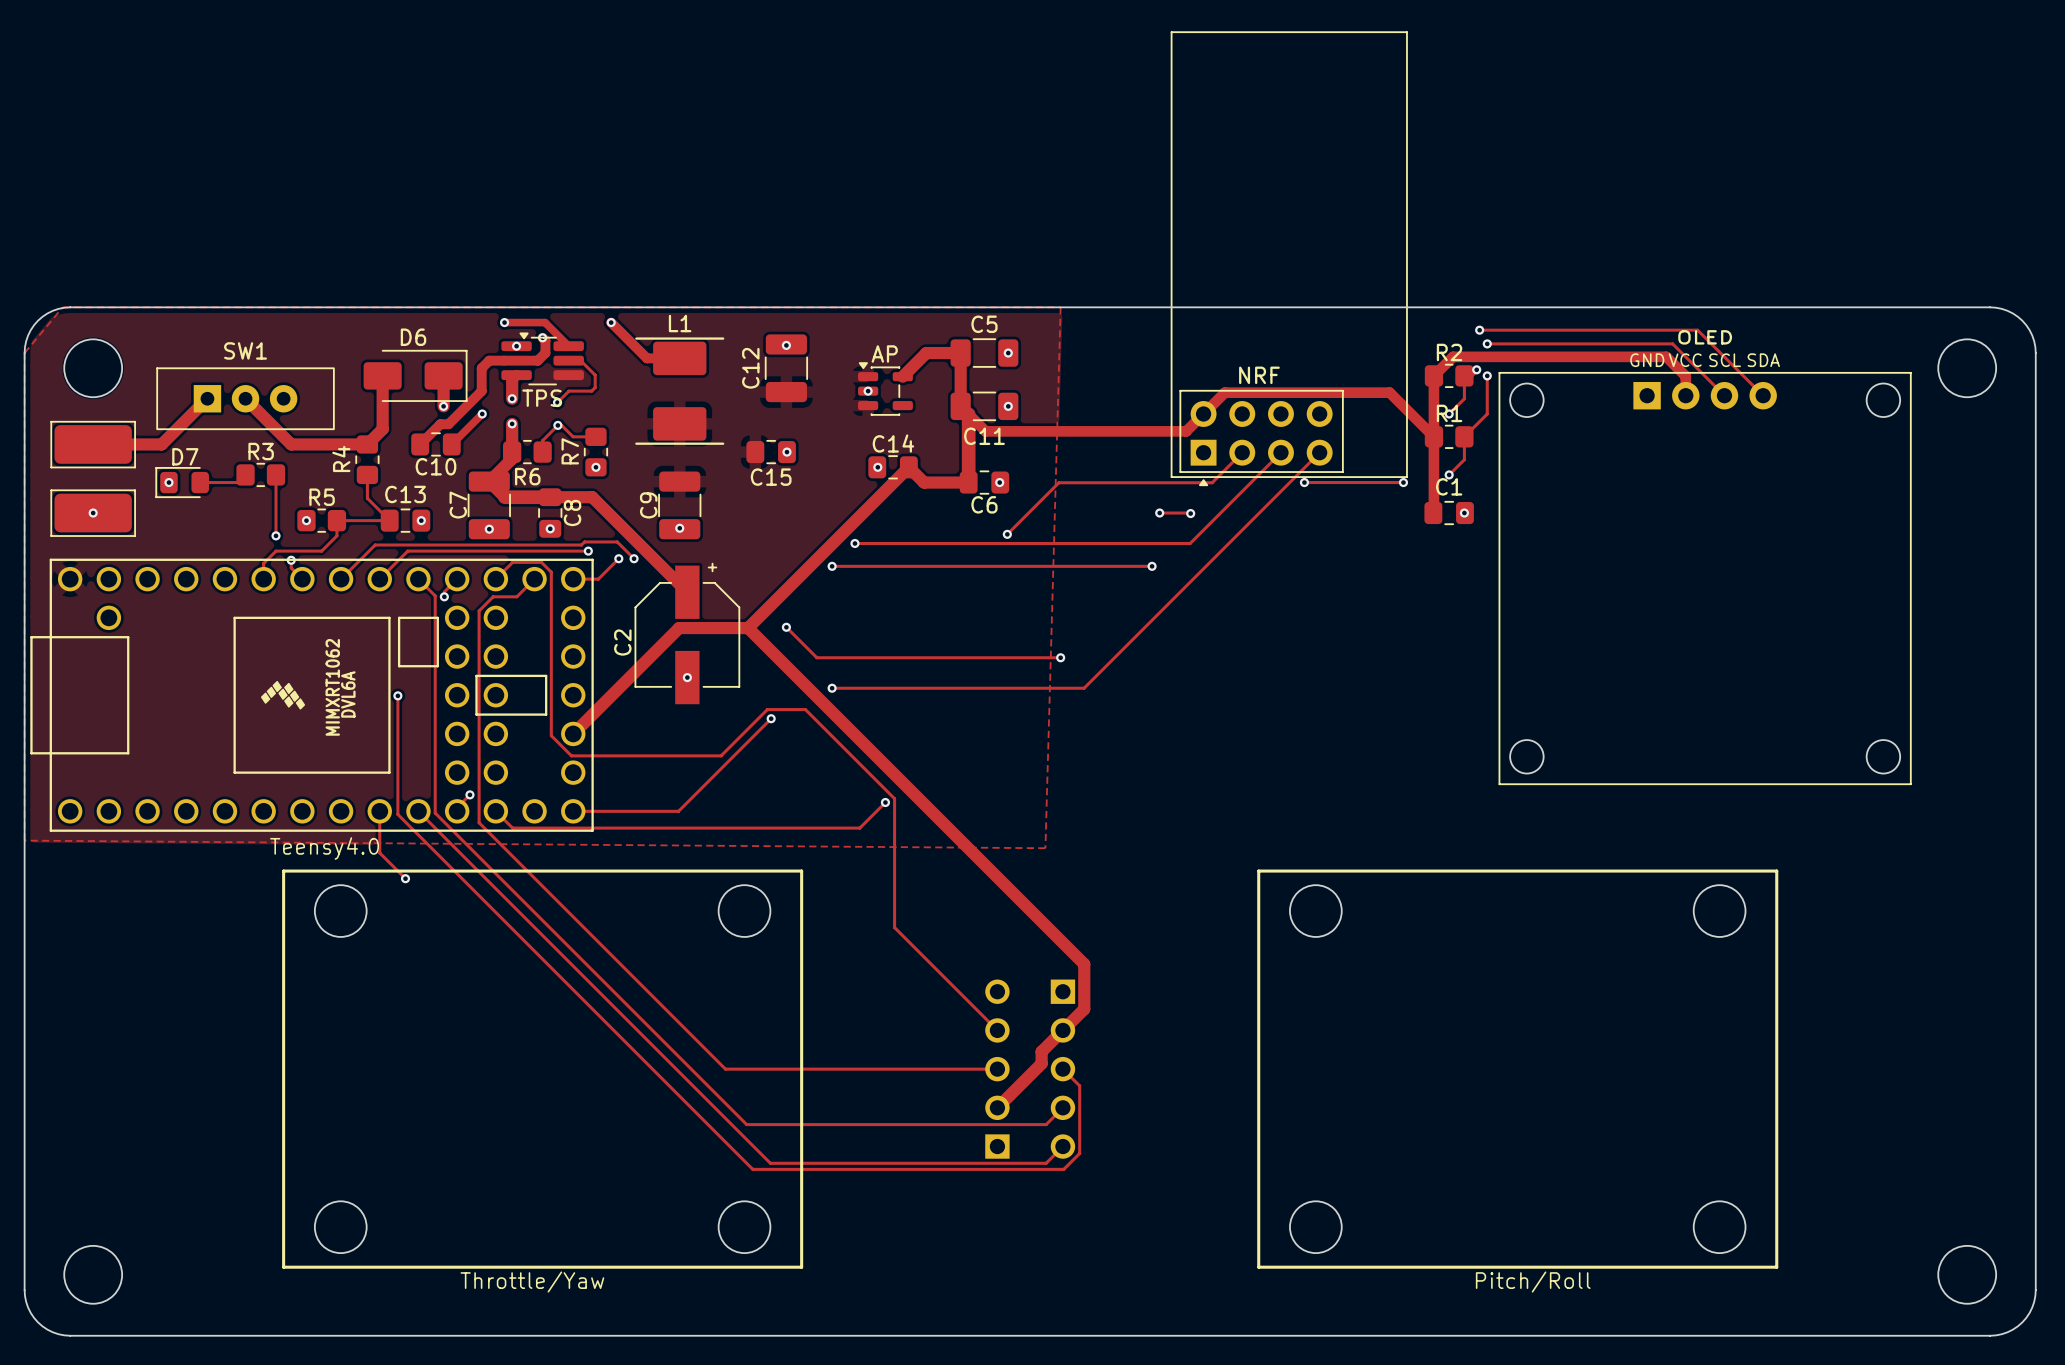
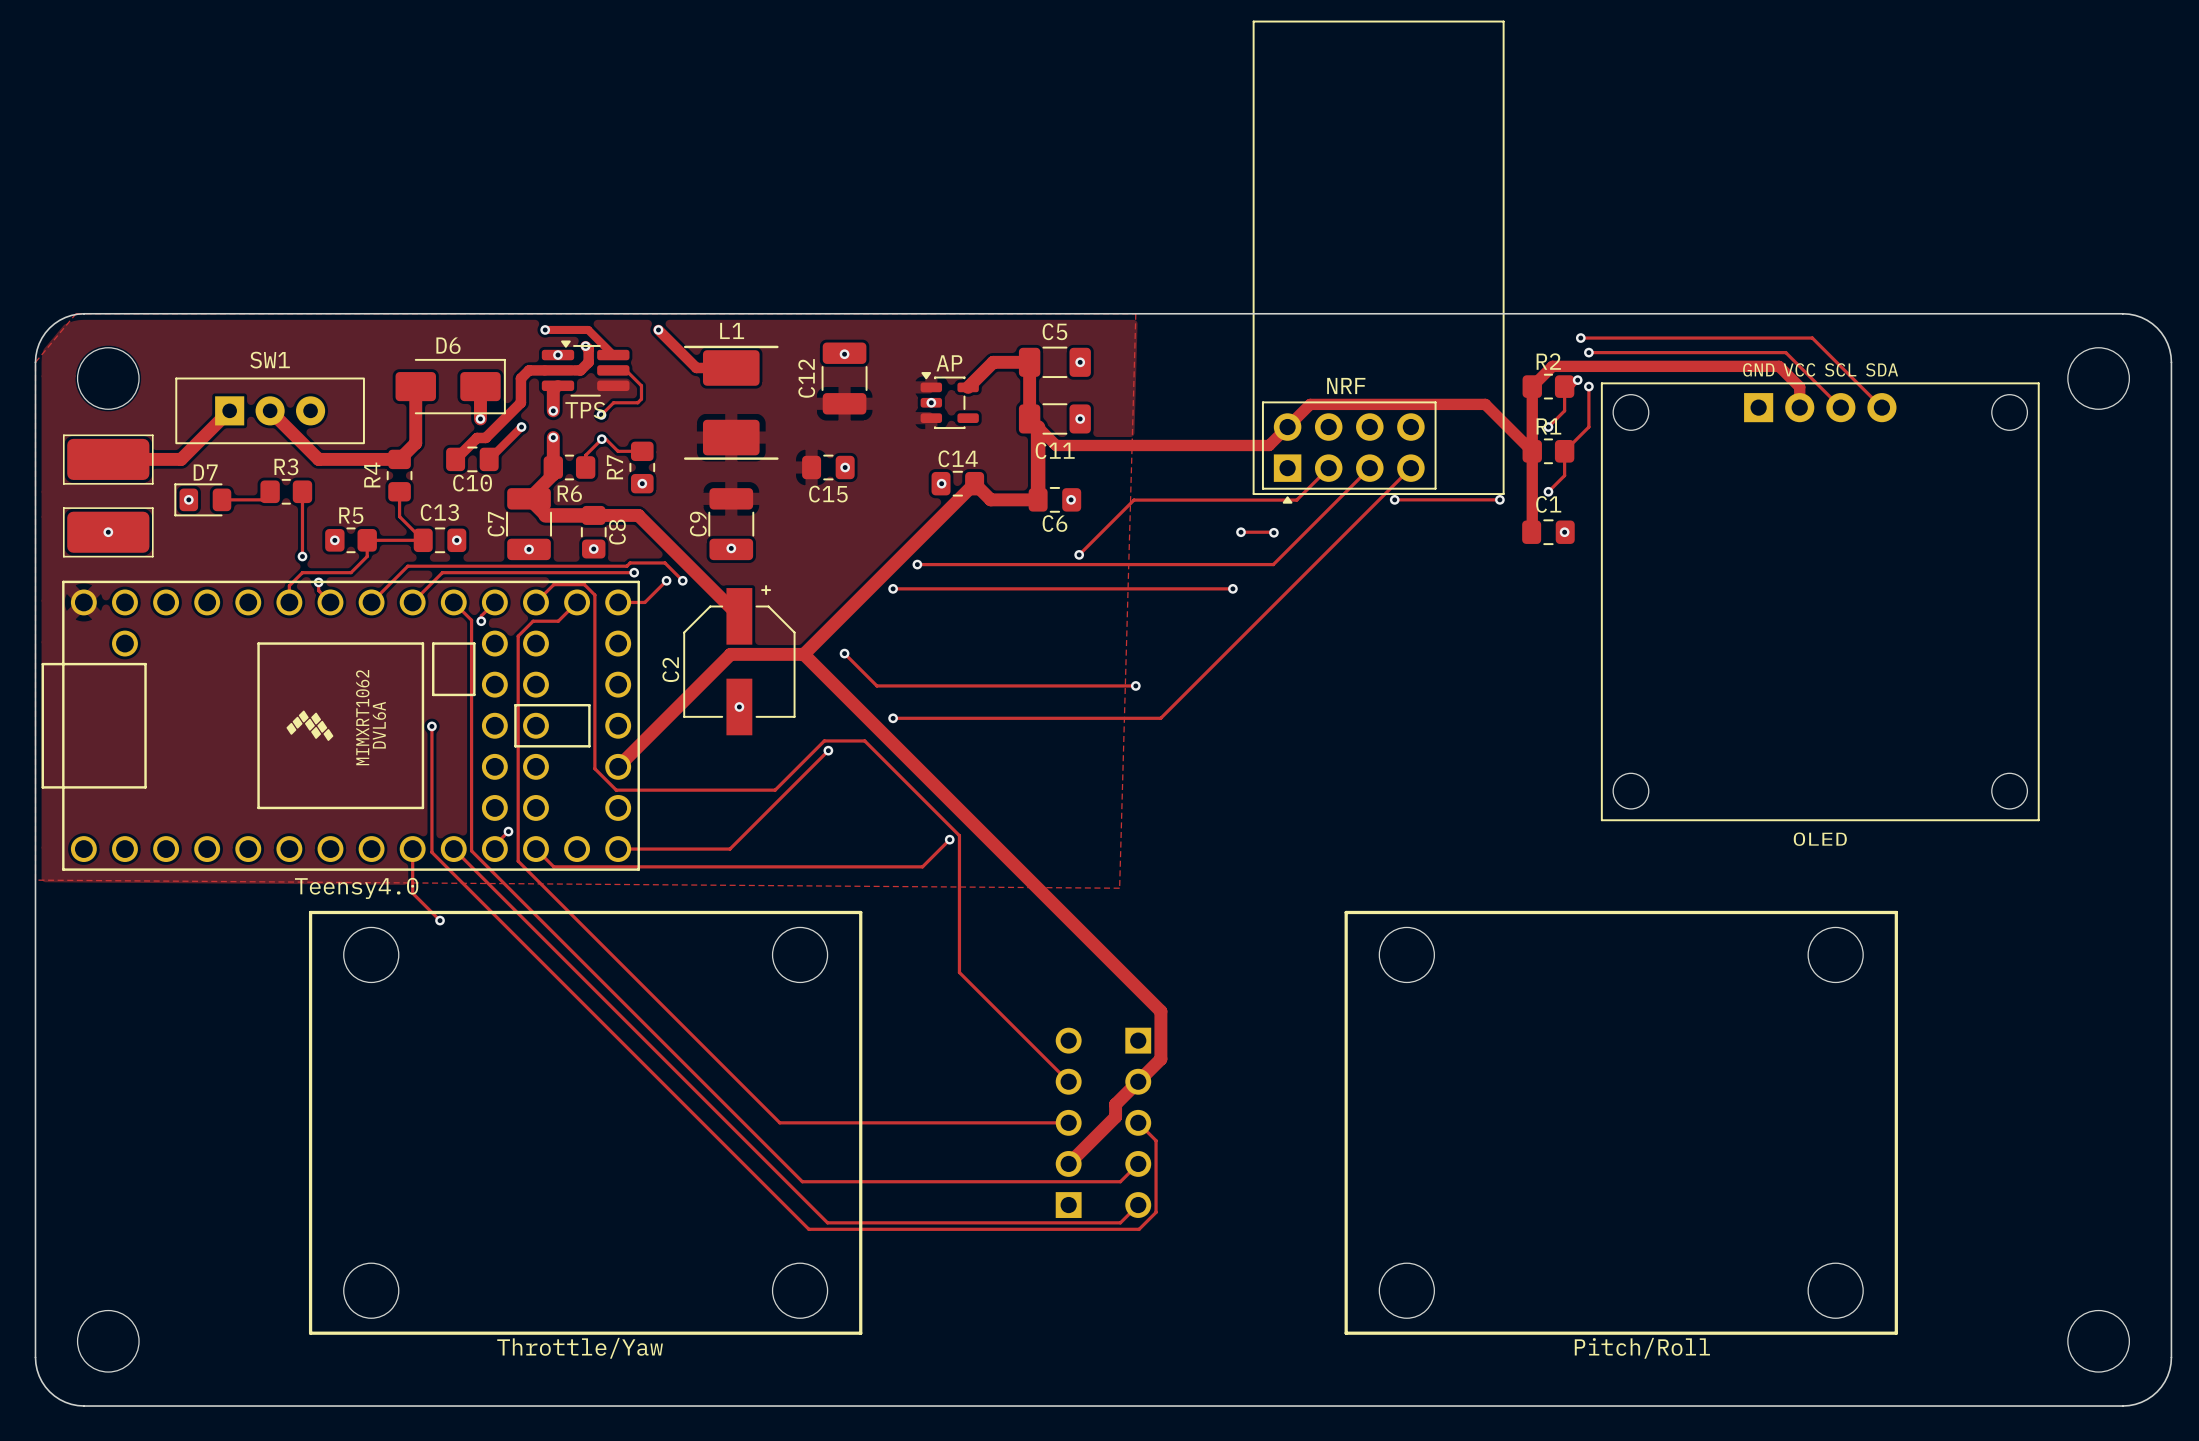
OLED name position: OLED (1705, 337) -> OLED (1820, 839)

